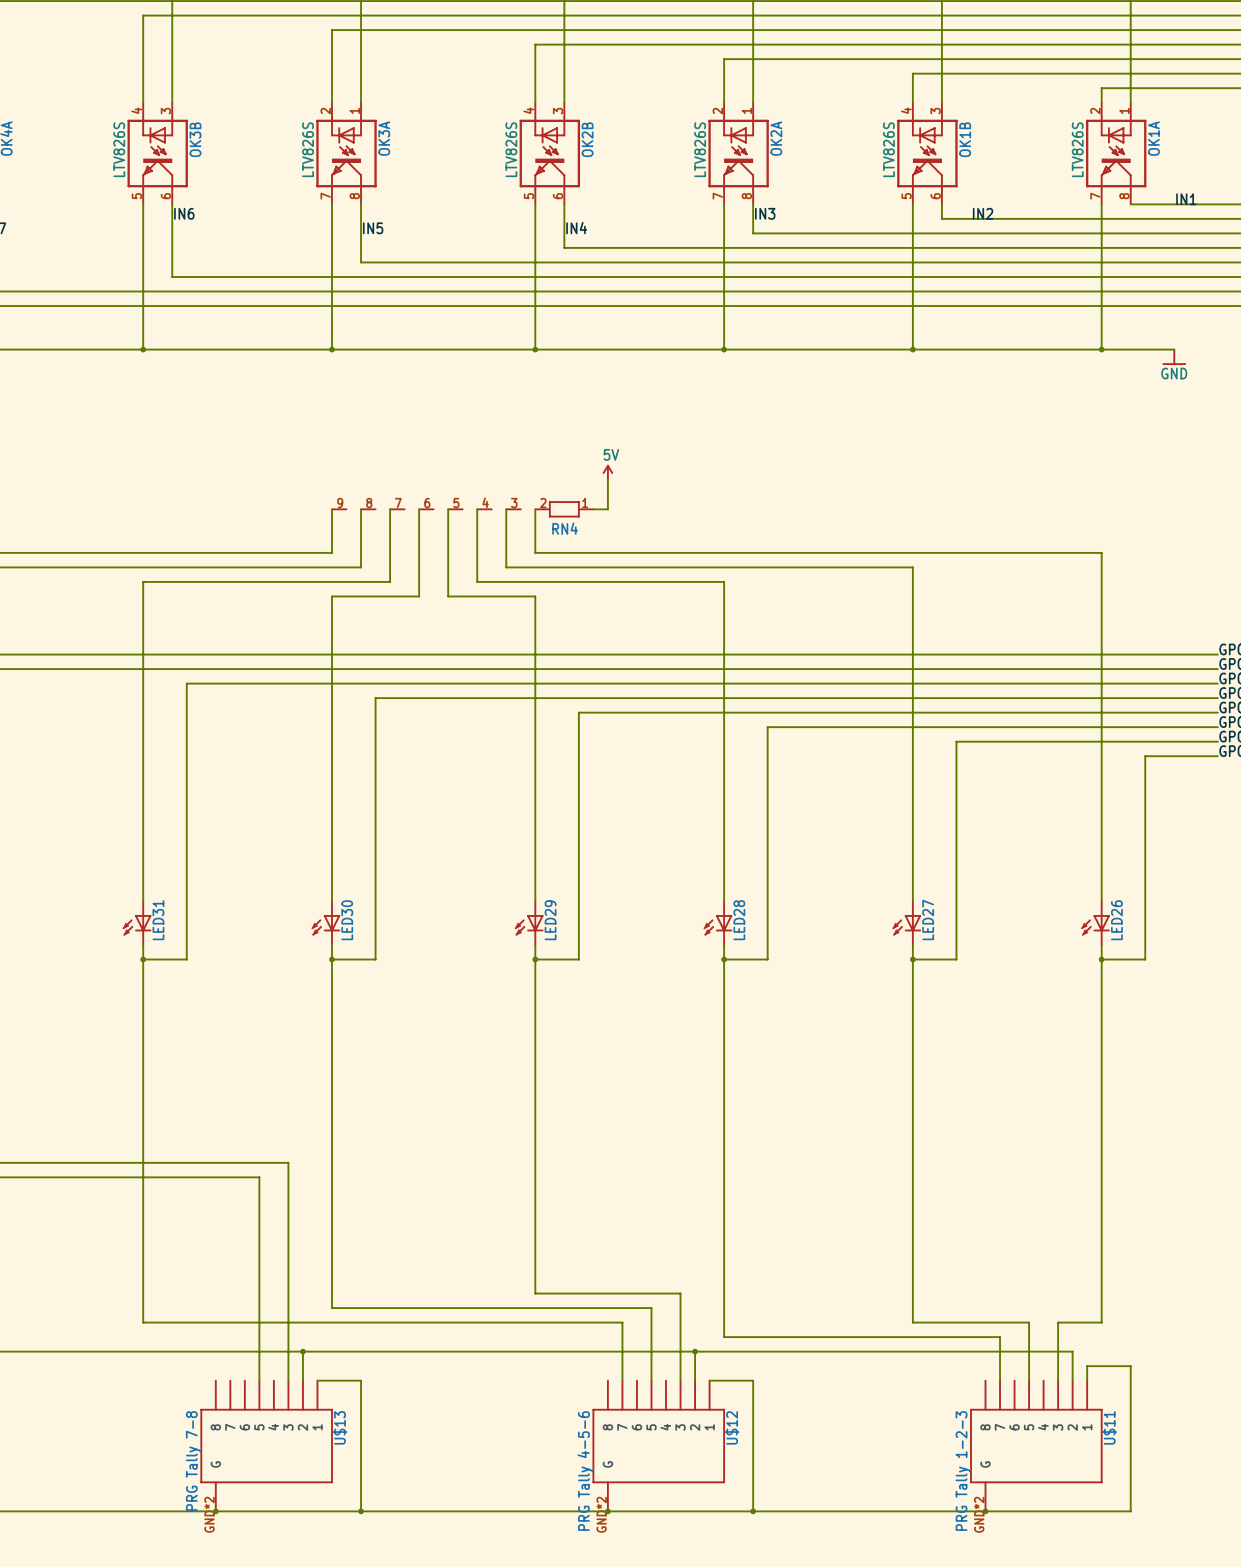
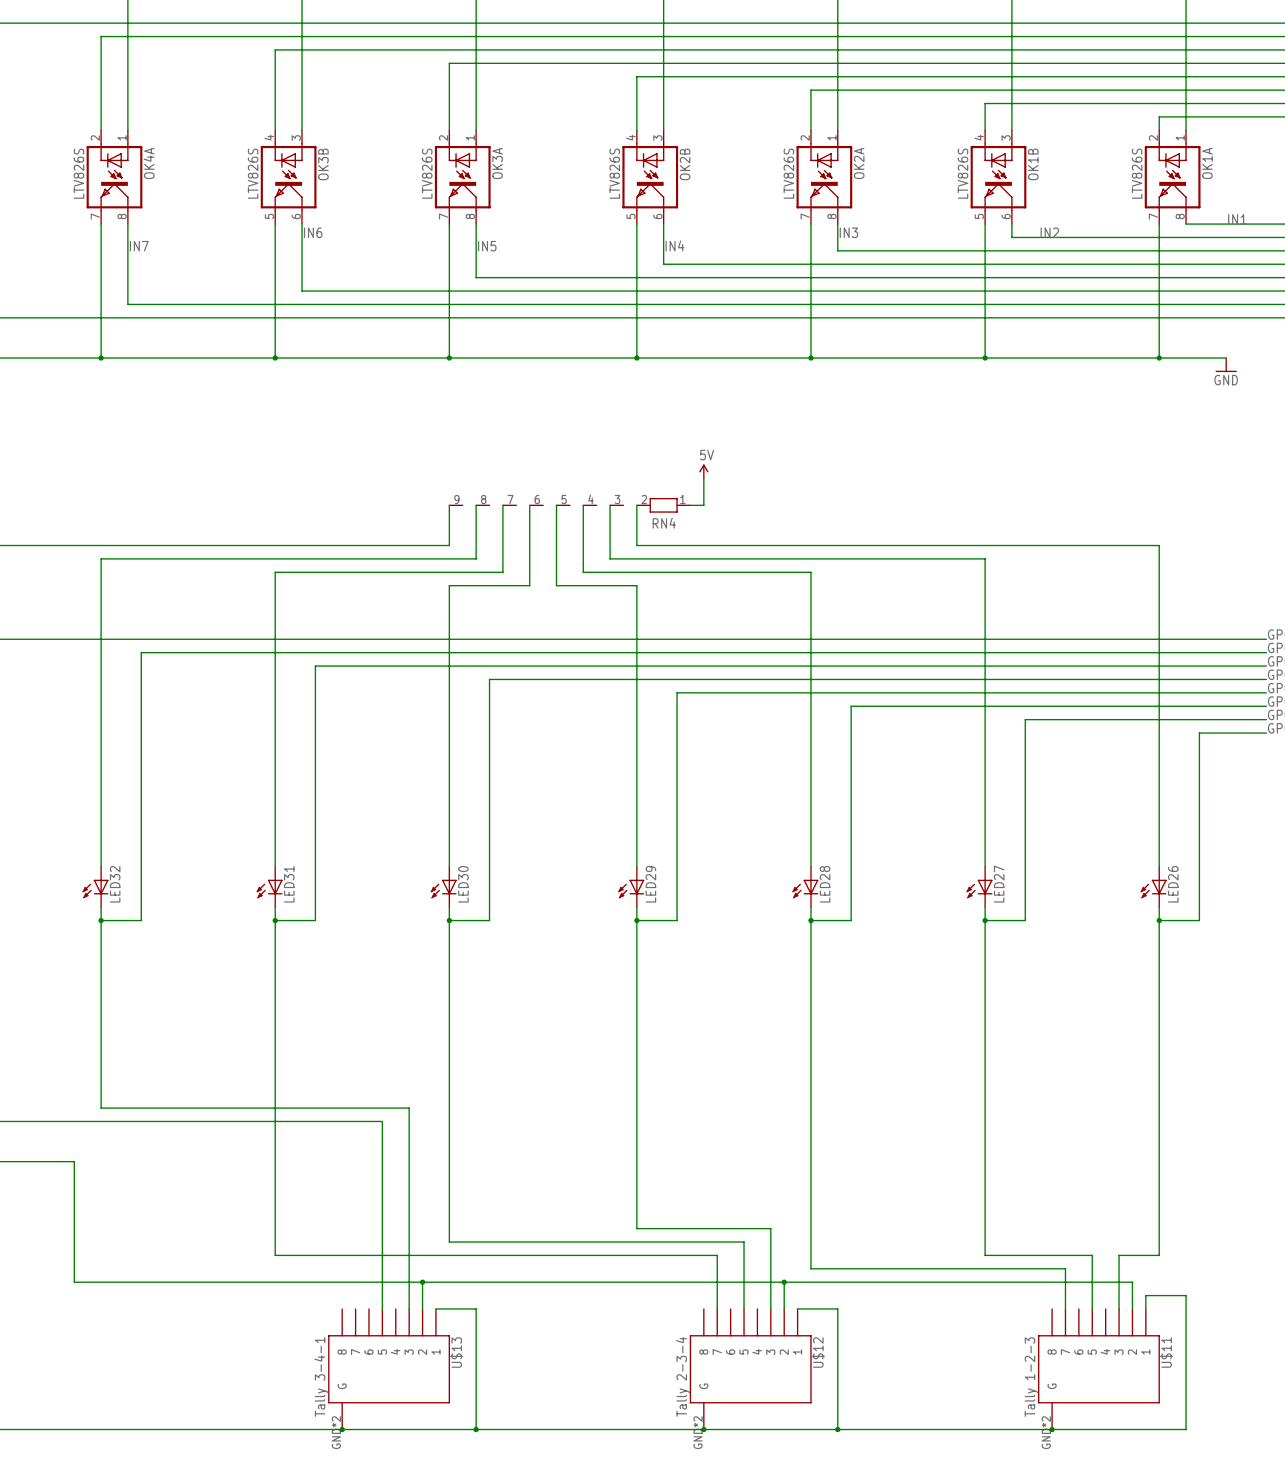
U$13 value: PRG Tally 7-8 (193, 1461) -> Tally 3-4-1 (321, 1377)
U$12 value: PRG Tally 4-5-6 (585, 1471) -> Tally 2-3-4 (683, 1376)
U$11 value: PRG Tally 1-2-3 (963, 1471) -> Tally 1-2-3 (1031, 1377)

